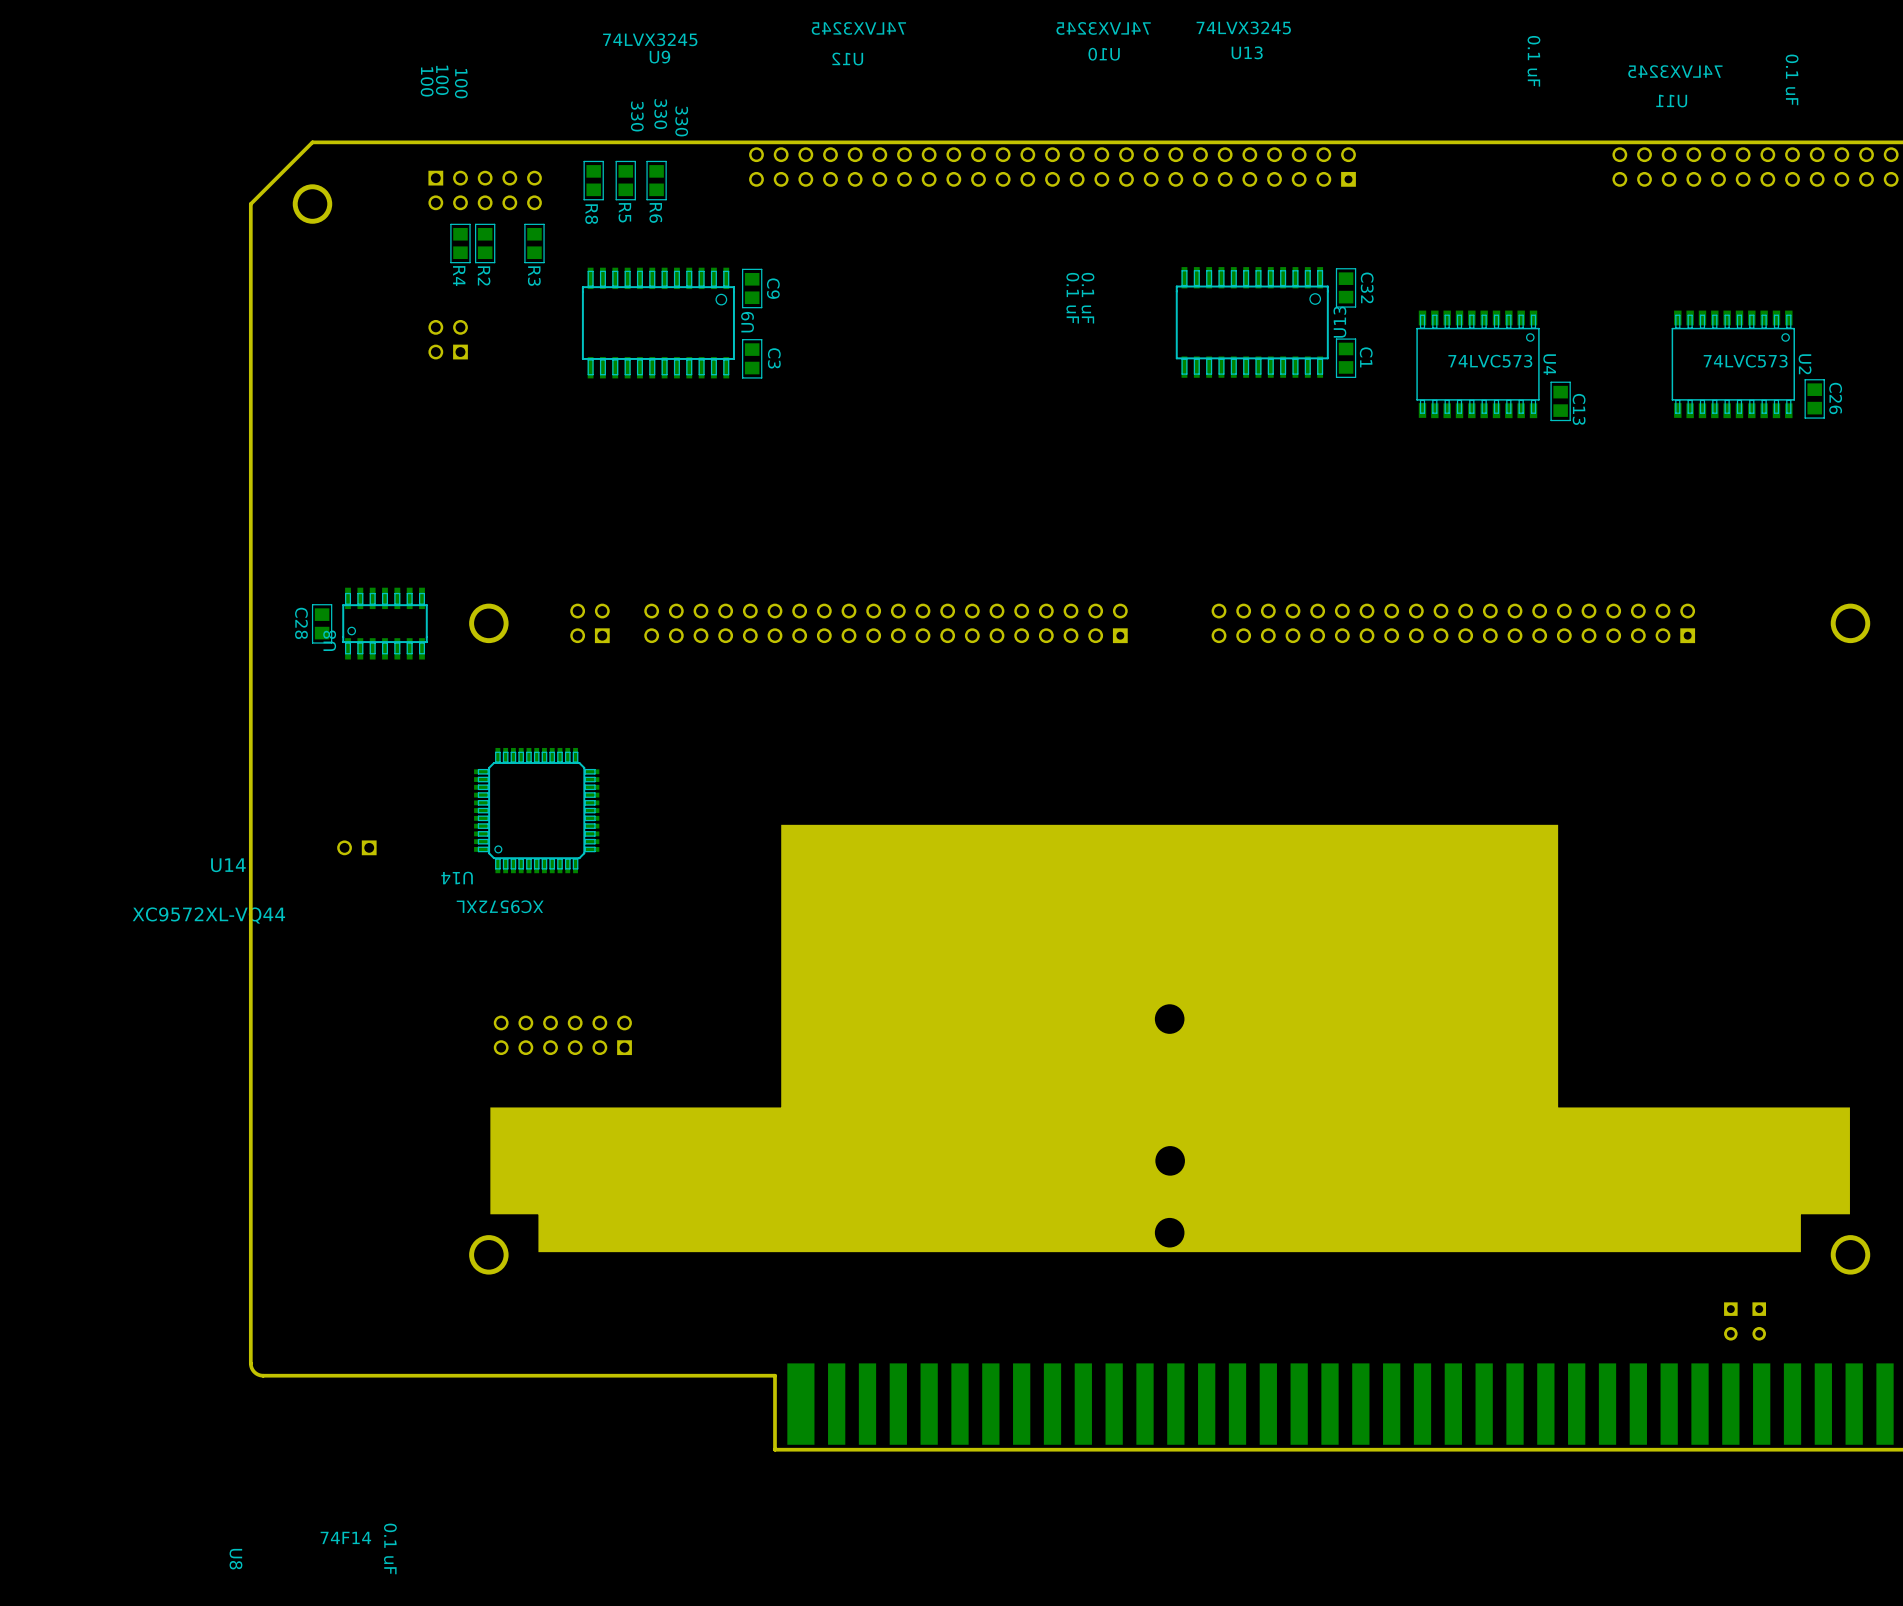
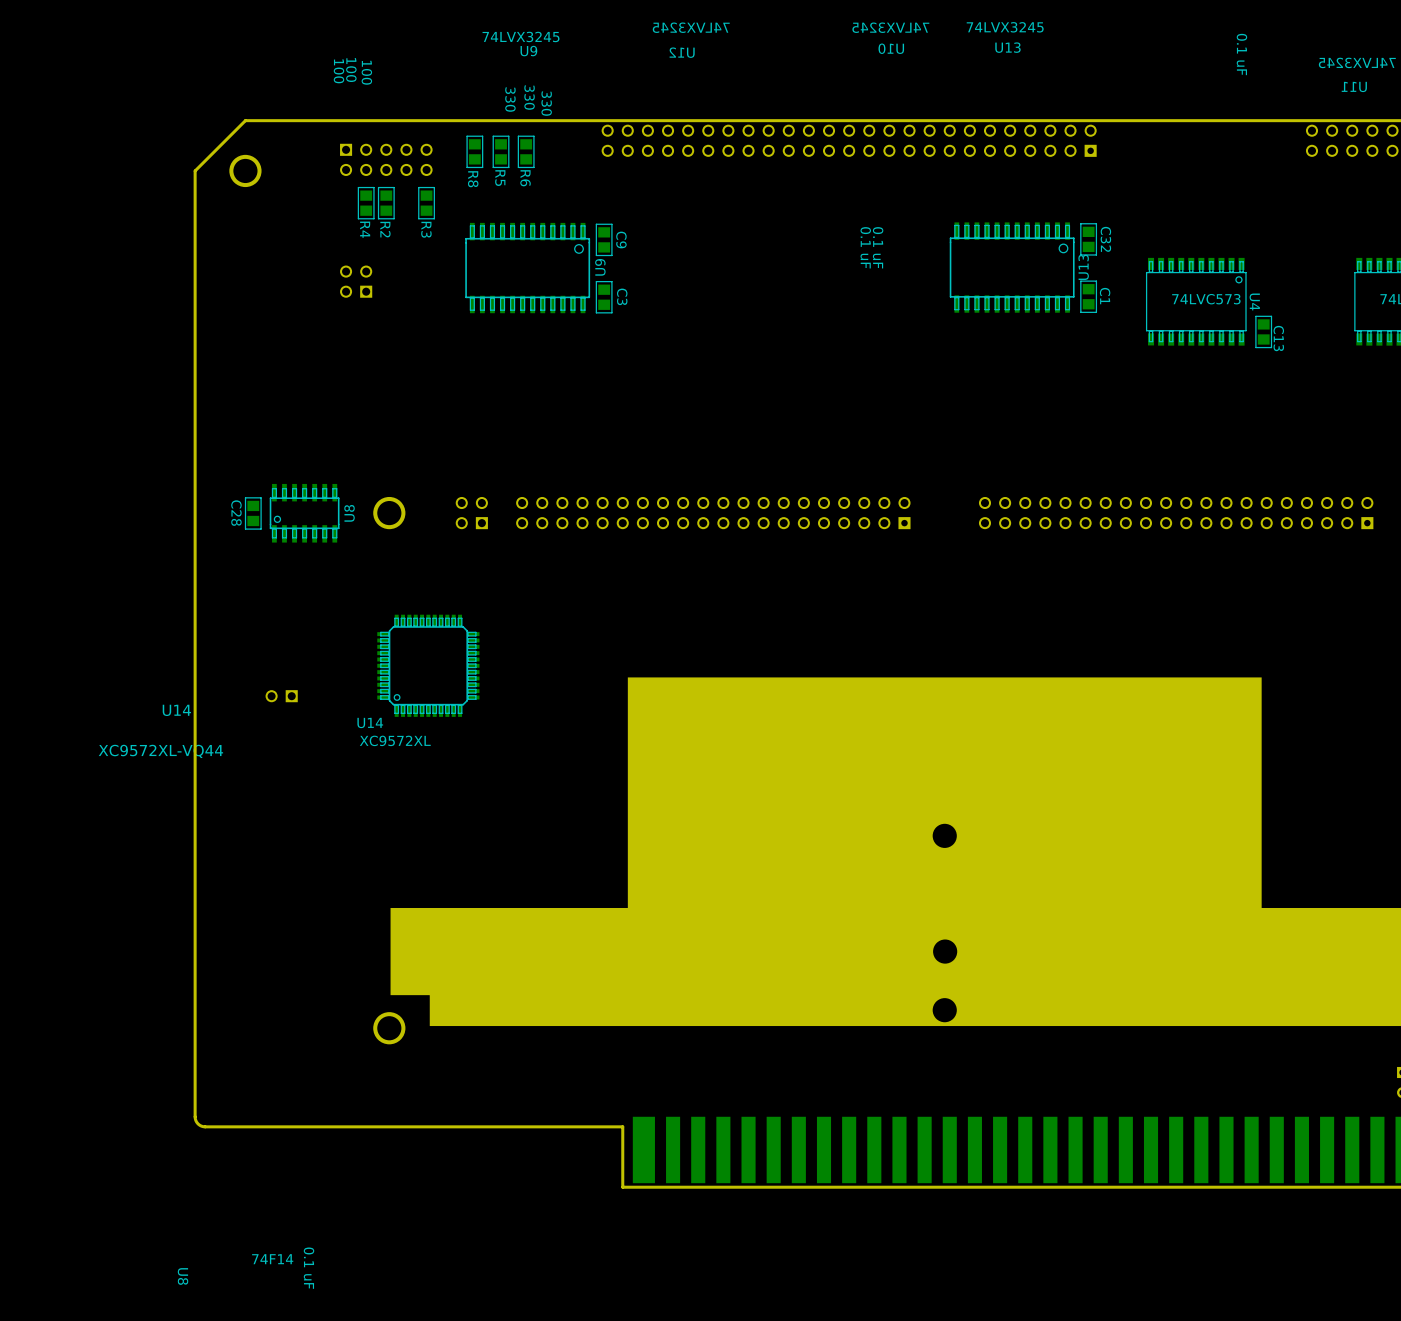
text position: U8 (329, 640) -> U8 (349, 513)
text rotation: 0° (457, 878) -> 180° (370, 722)
text rotation: 0° (500, 906) -> 180° (395, 740)
part: (562, 1035) -> none

